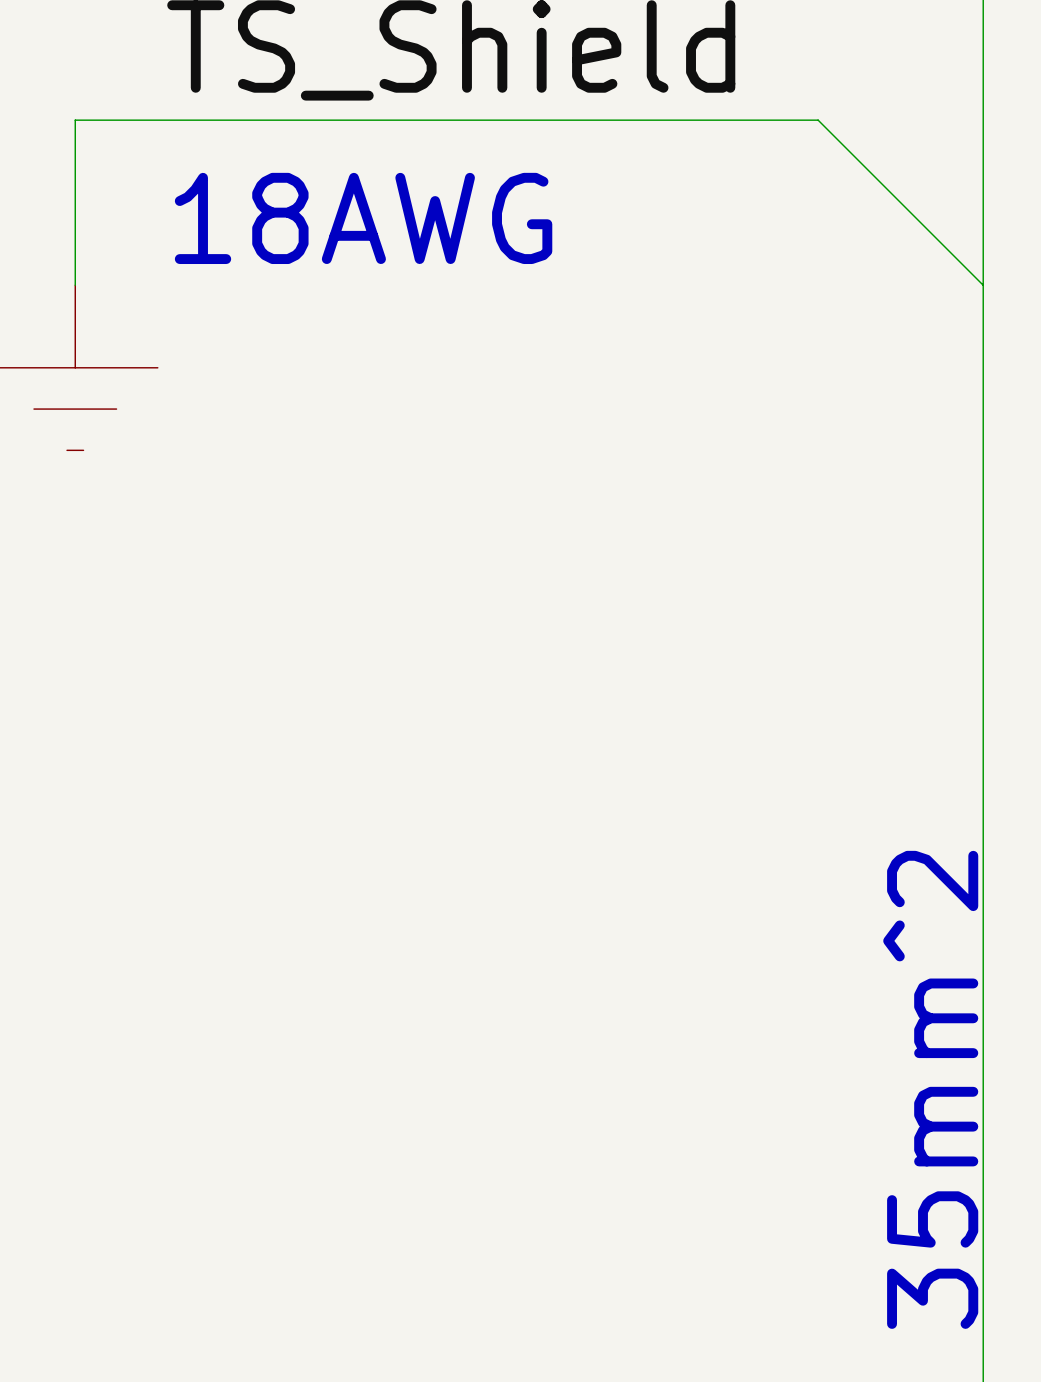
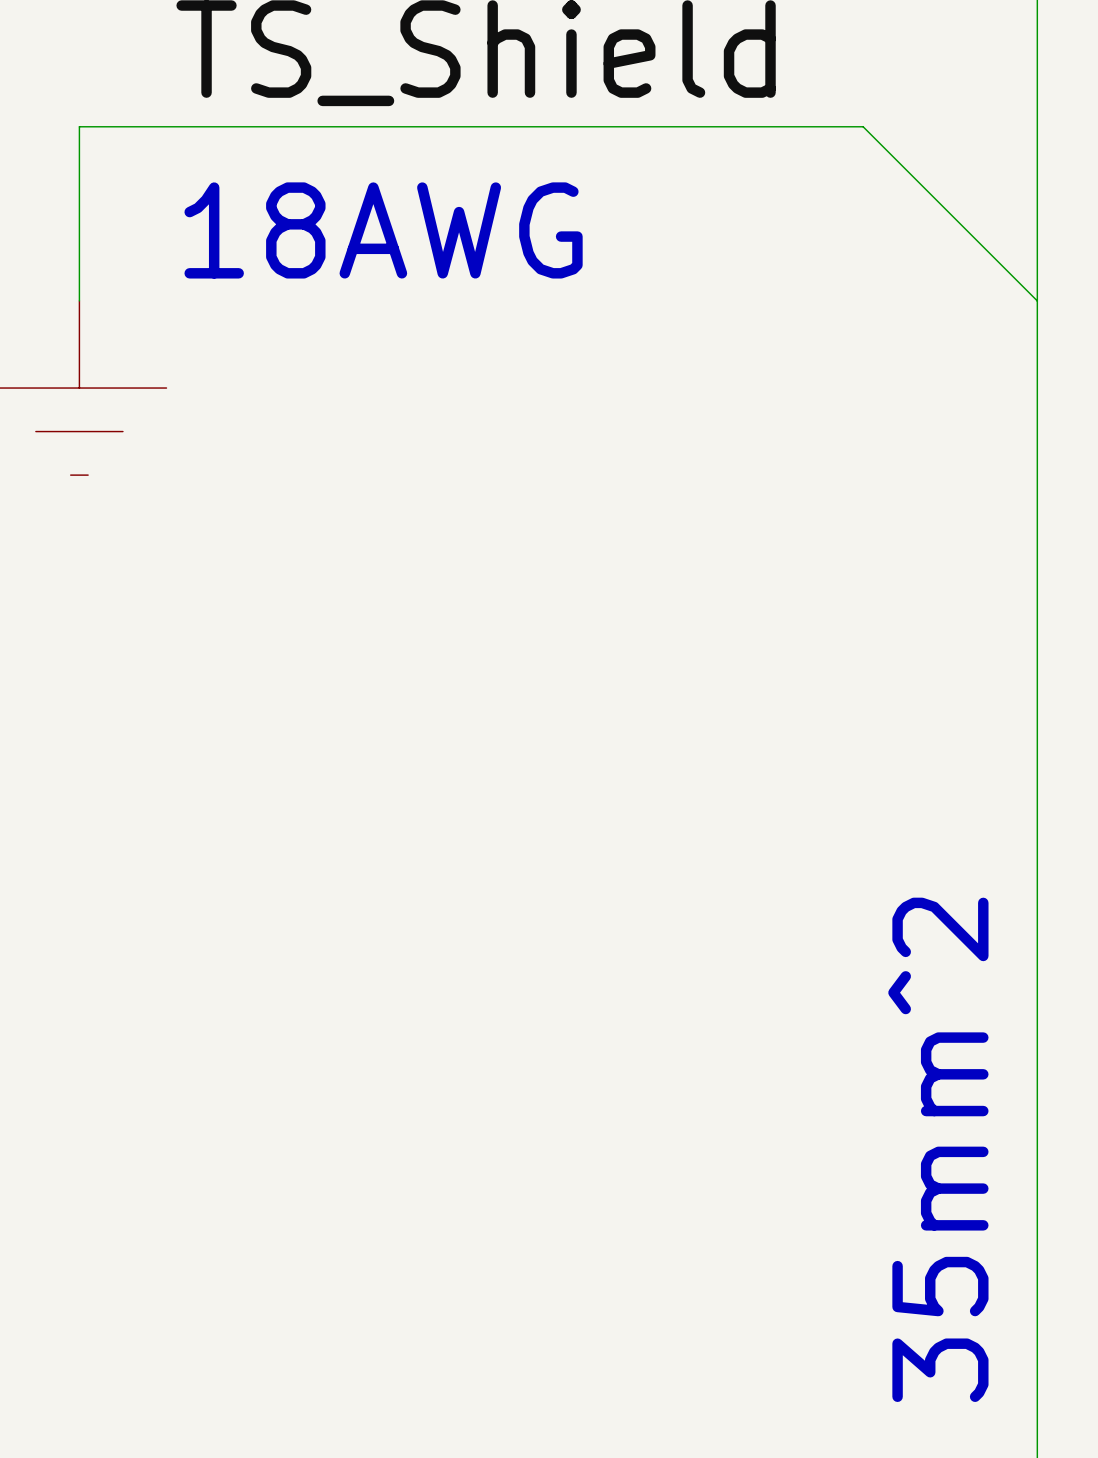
text position: 35mm^2 (930, 1089) -> 35mm^2 (938, 1149)

